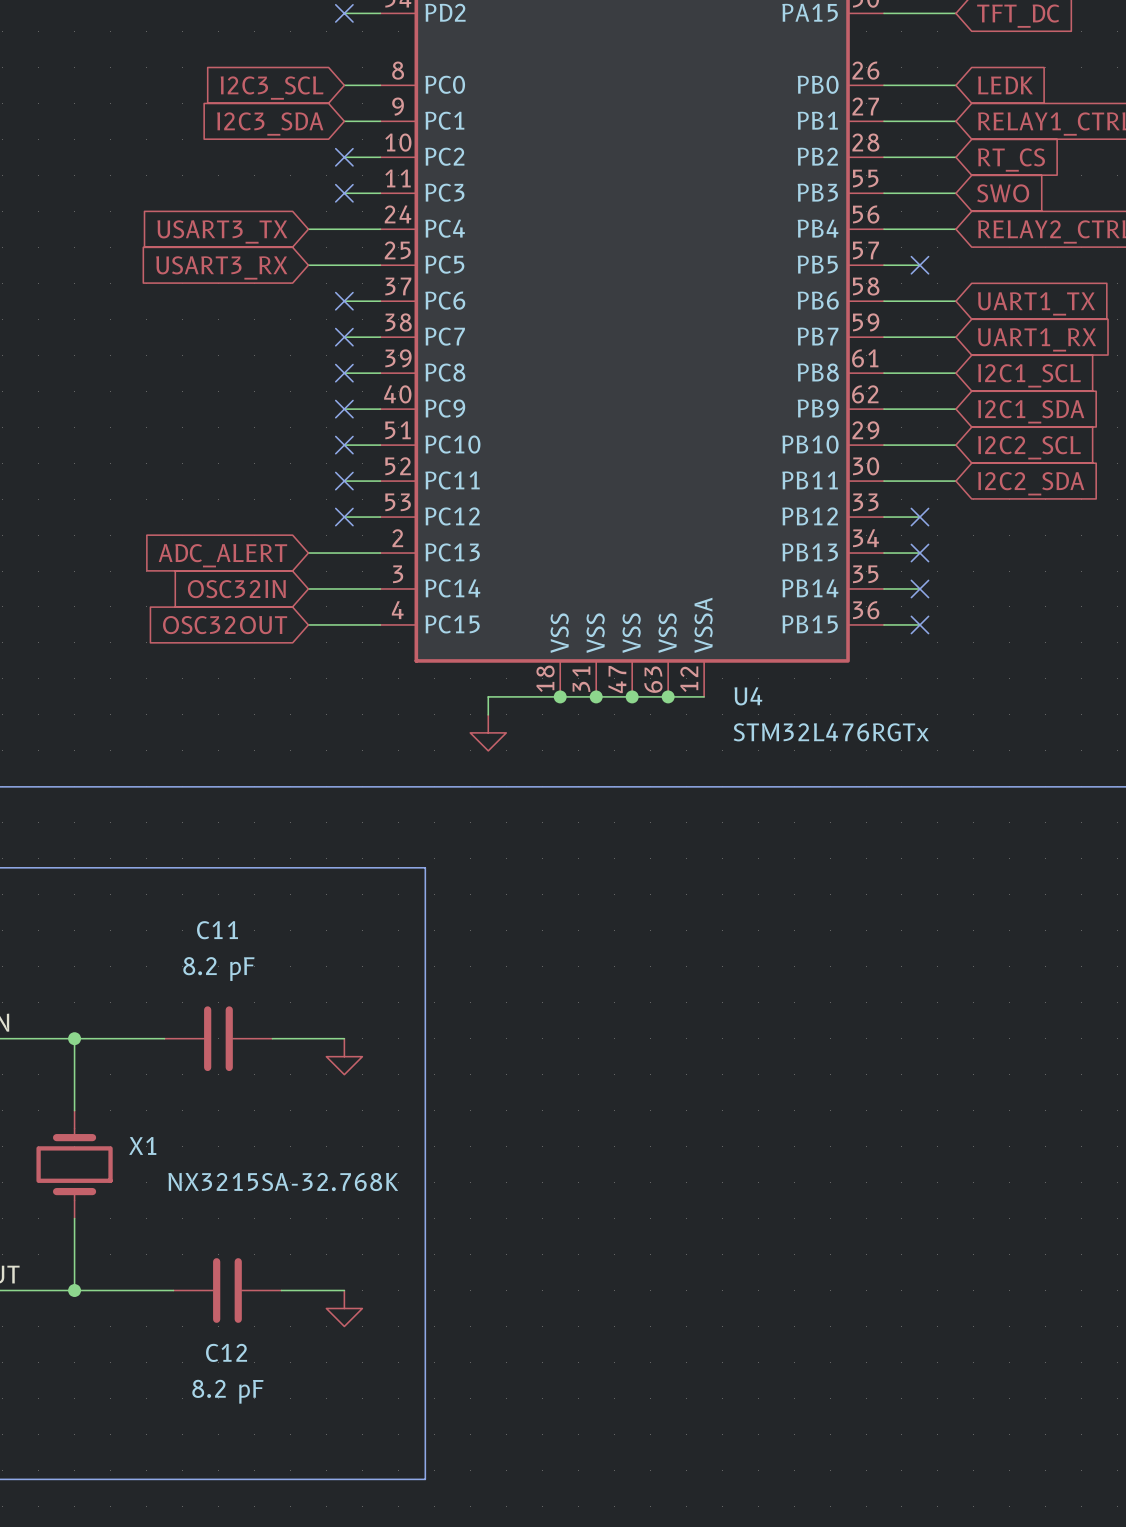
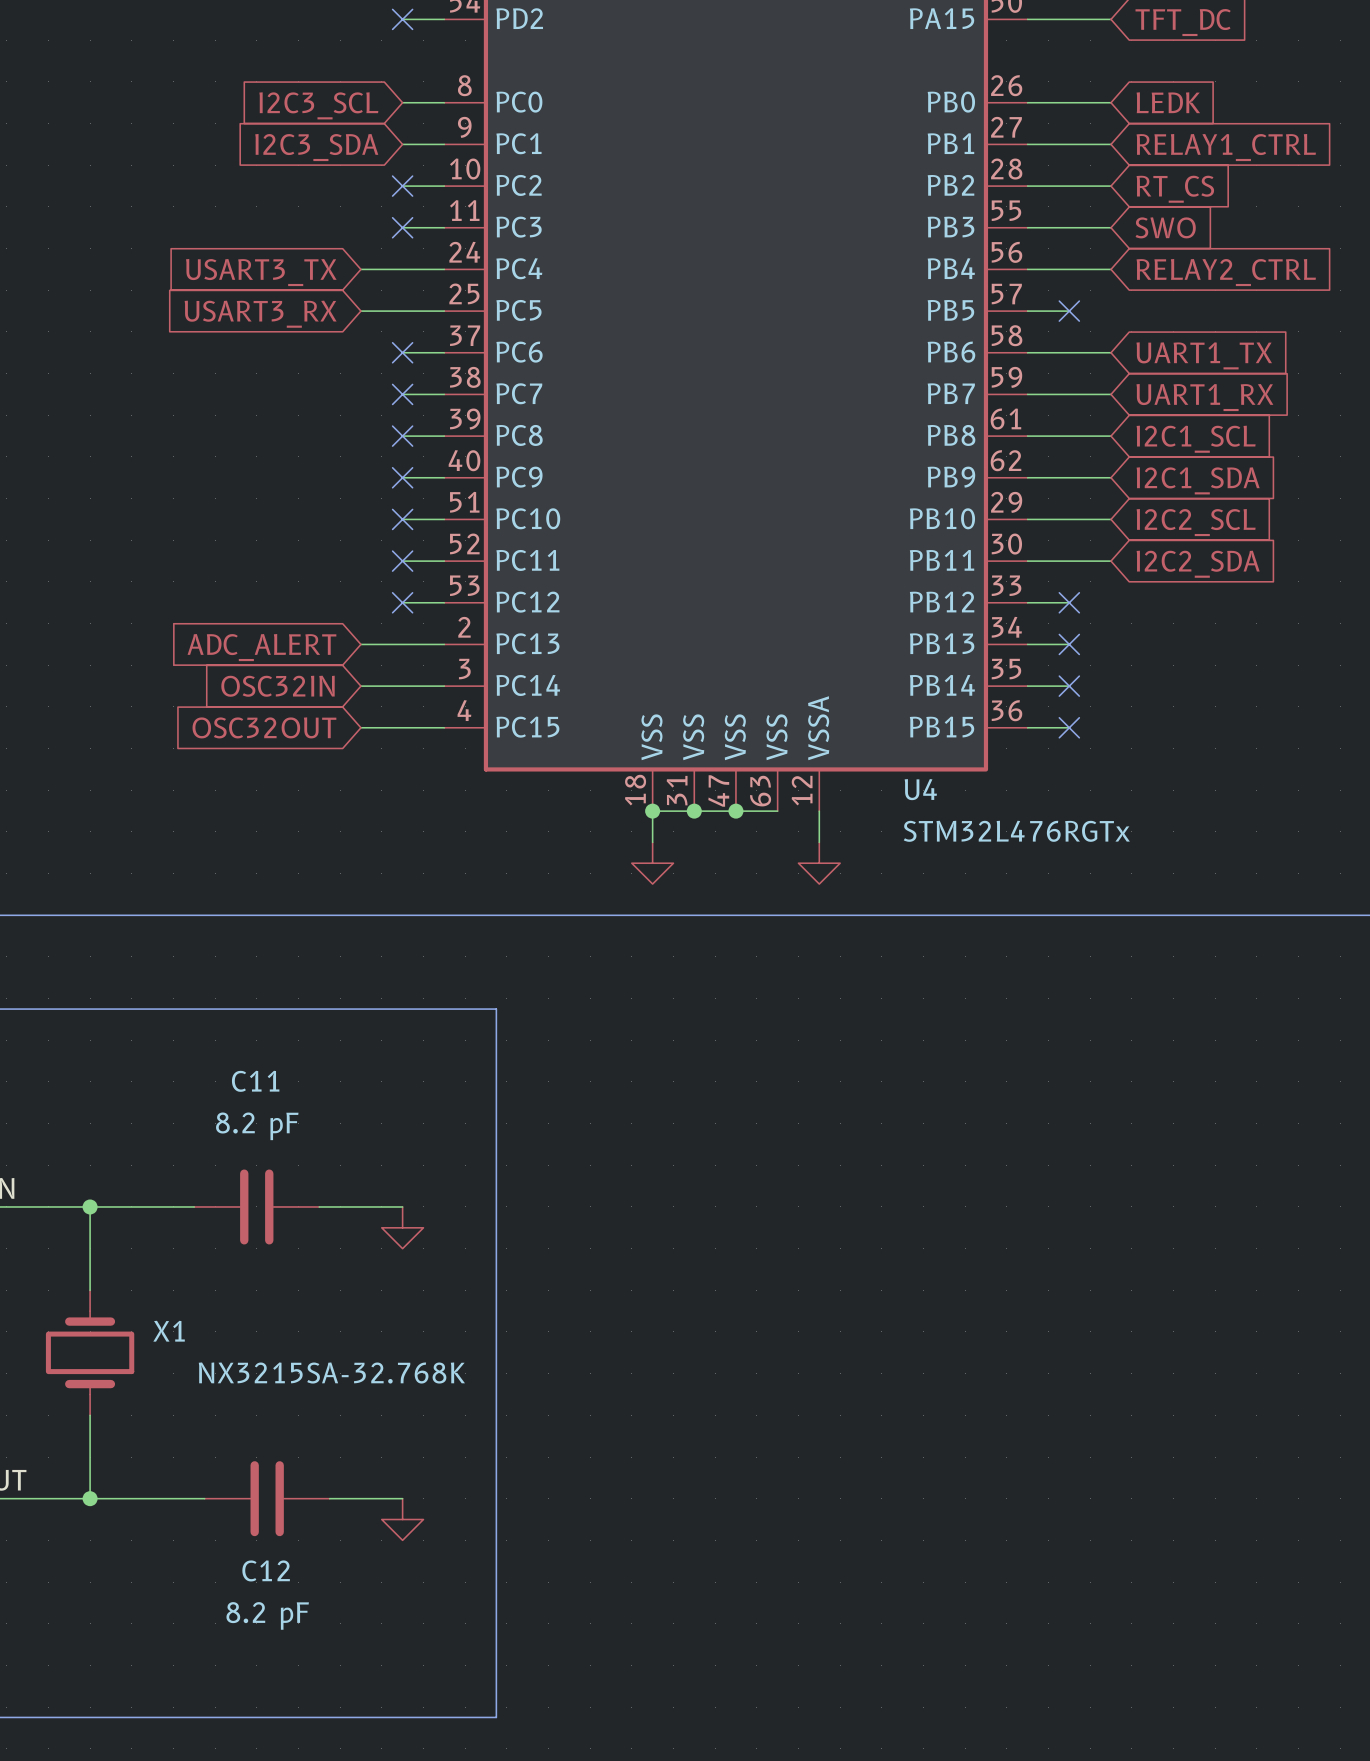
wire: (560, 696) (488, 696) (488, 714) -> (652, 811) (652, 842)
wire: (668, 696) (704, 696) -> (819, 842) (819, 811)
junction: (668, 696) -> none
U4 name position: U4 (748, 696) -> U4 (920, 789)
power symbol position: (488, 732) -> (652, 863)
U4 value position: STM32L476RGTx (831, 732) -> STM32L476RGTx (1016, 831)
power symbol: none -> (819, 863)

